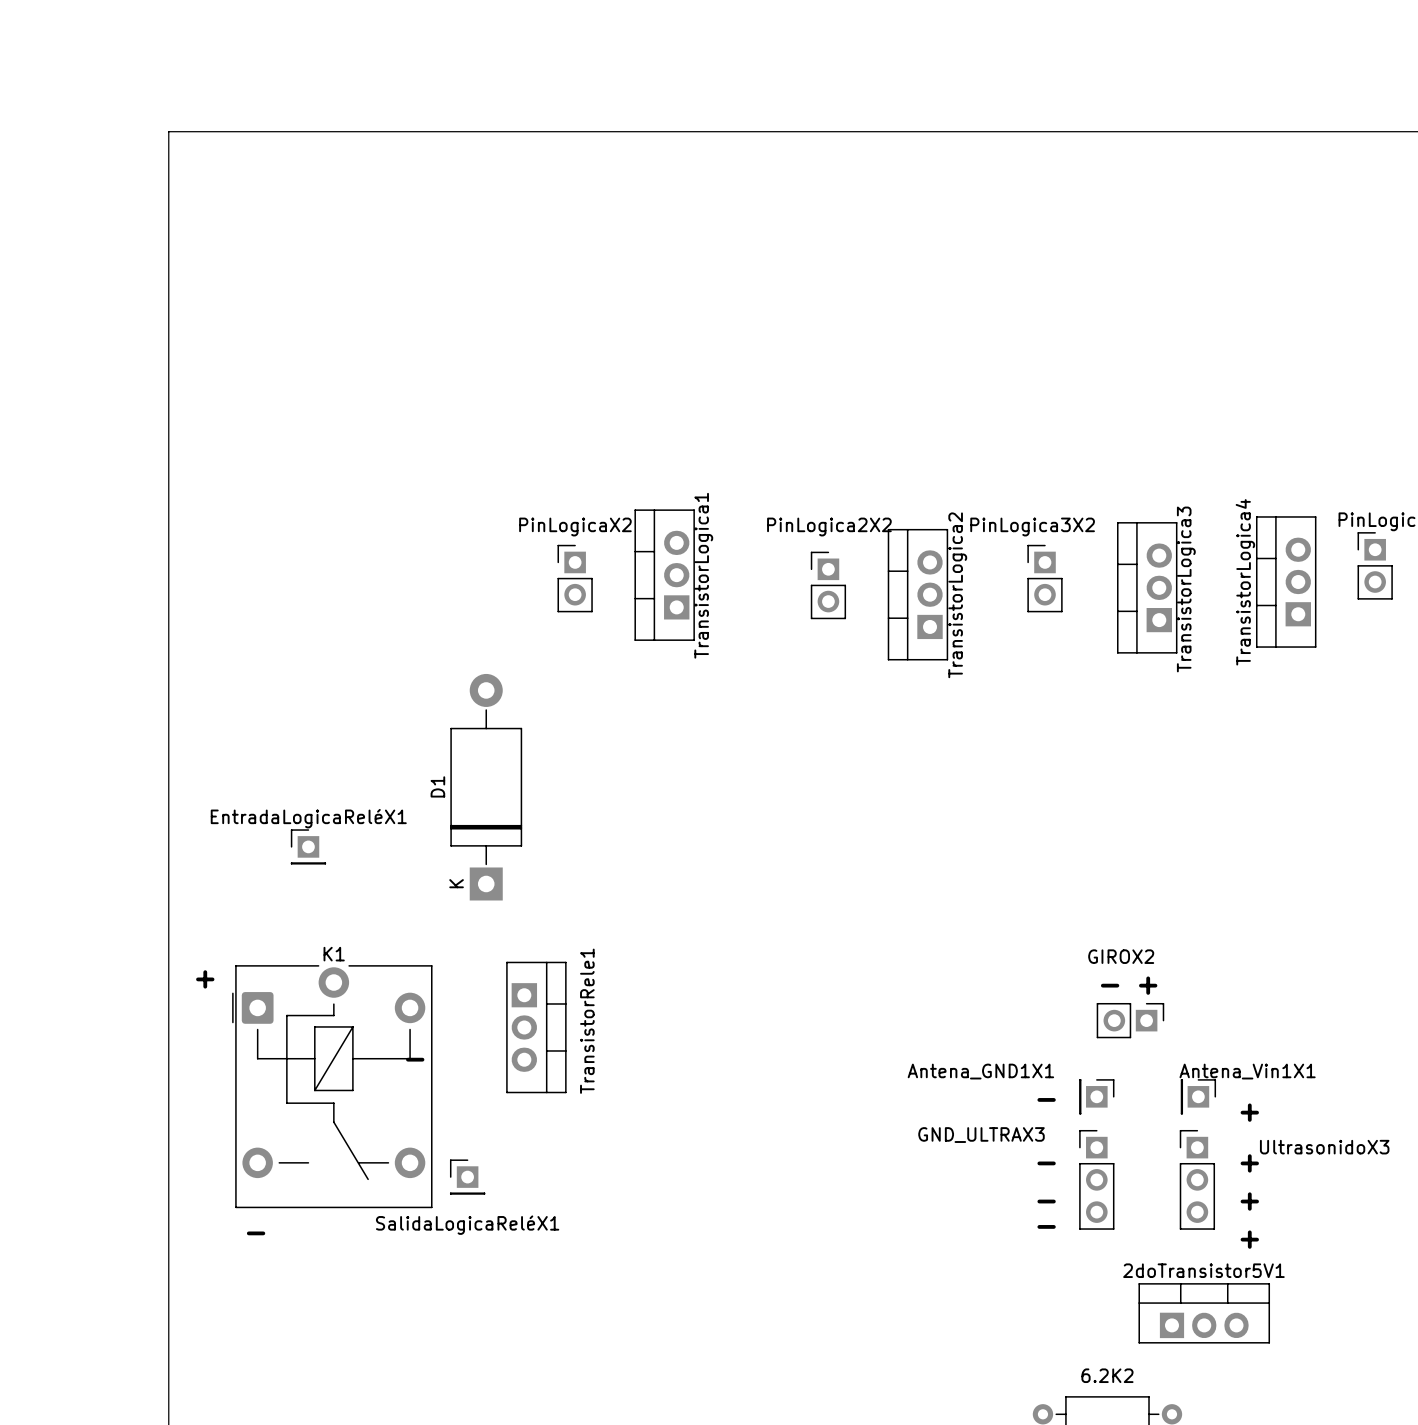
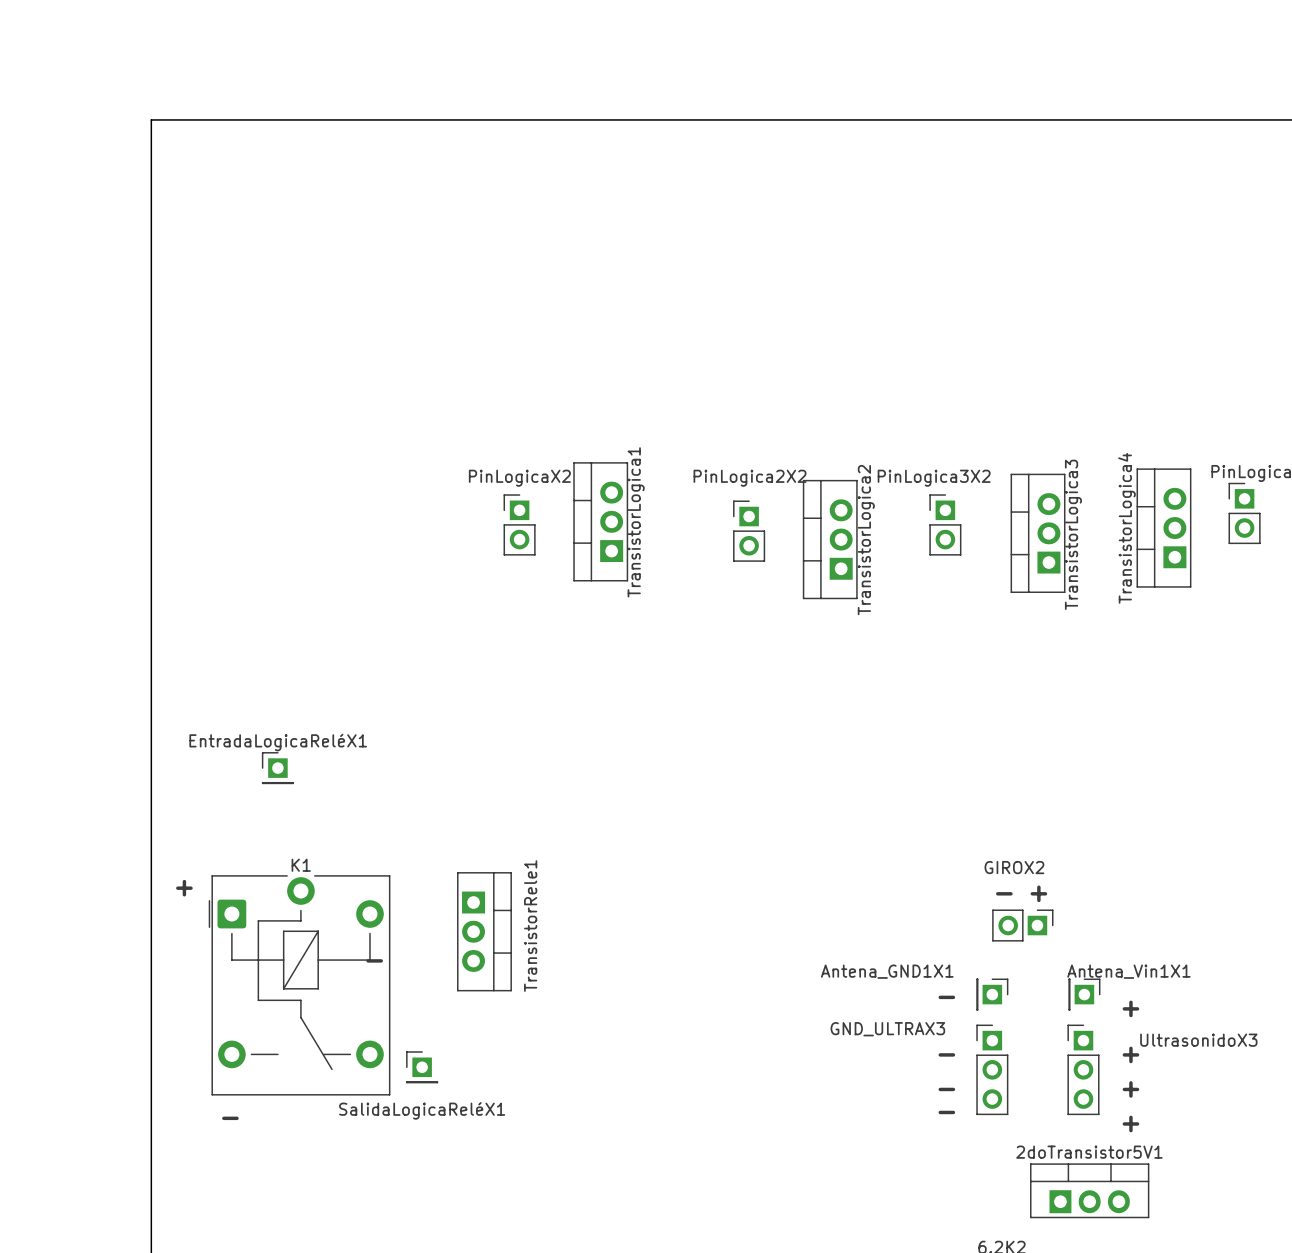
D1: (486, 787) -> none

